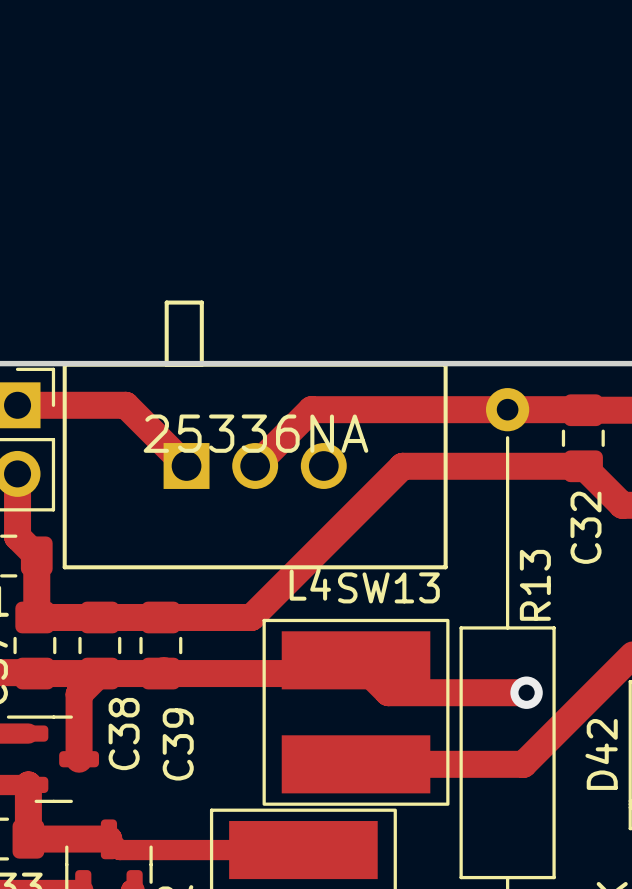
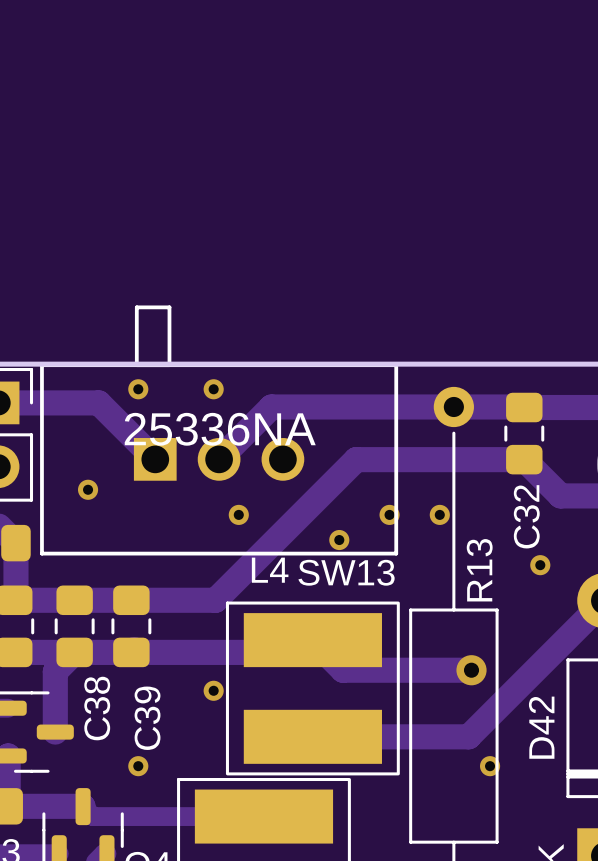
via: none -> (138, 389)
via: none -> (213, 389)
via: none -> (88, 489)
via: none -> (238, 514)
via: none -> (389, 514)
via: none -> (439, 514)
via: none -> (339, 540)
via: none -> (540, 565)
via: none -> (213, 690)
via: none -> (138, 766)
via: none -> (490, 766)

